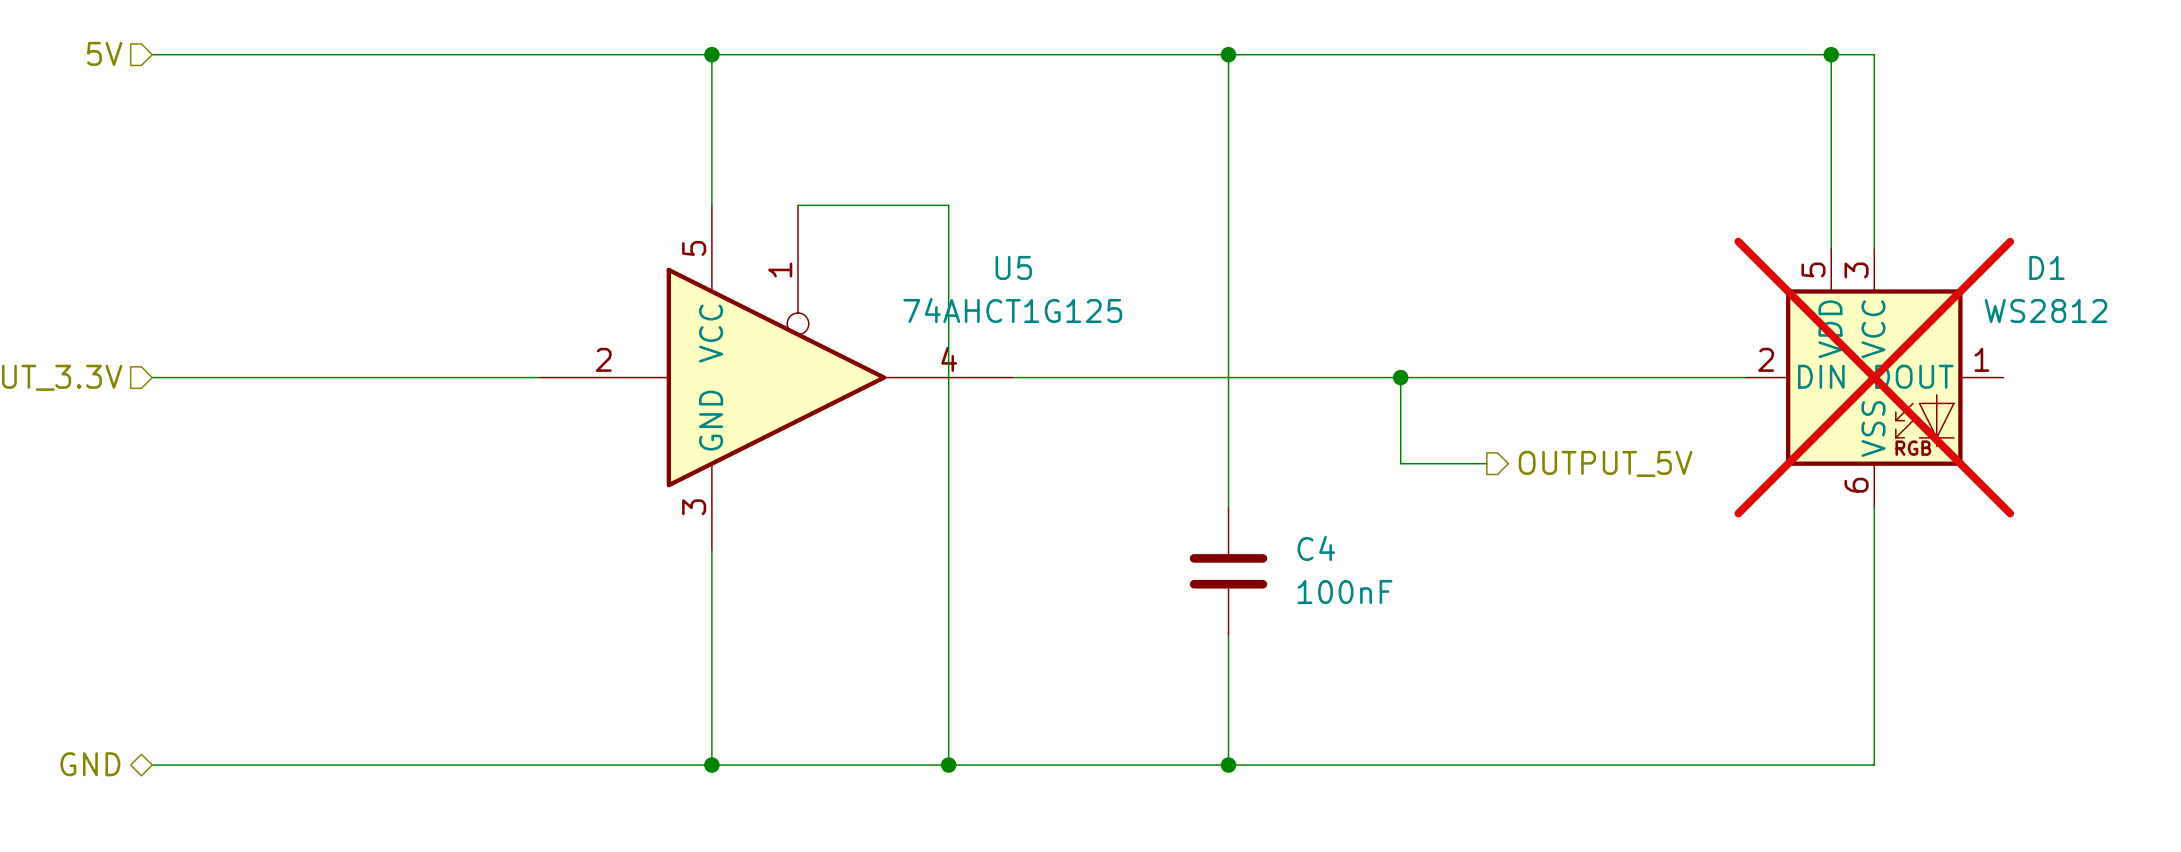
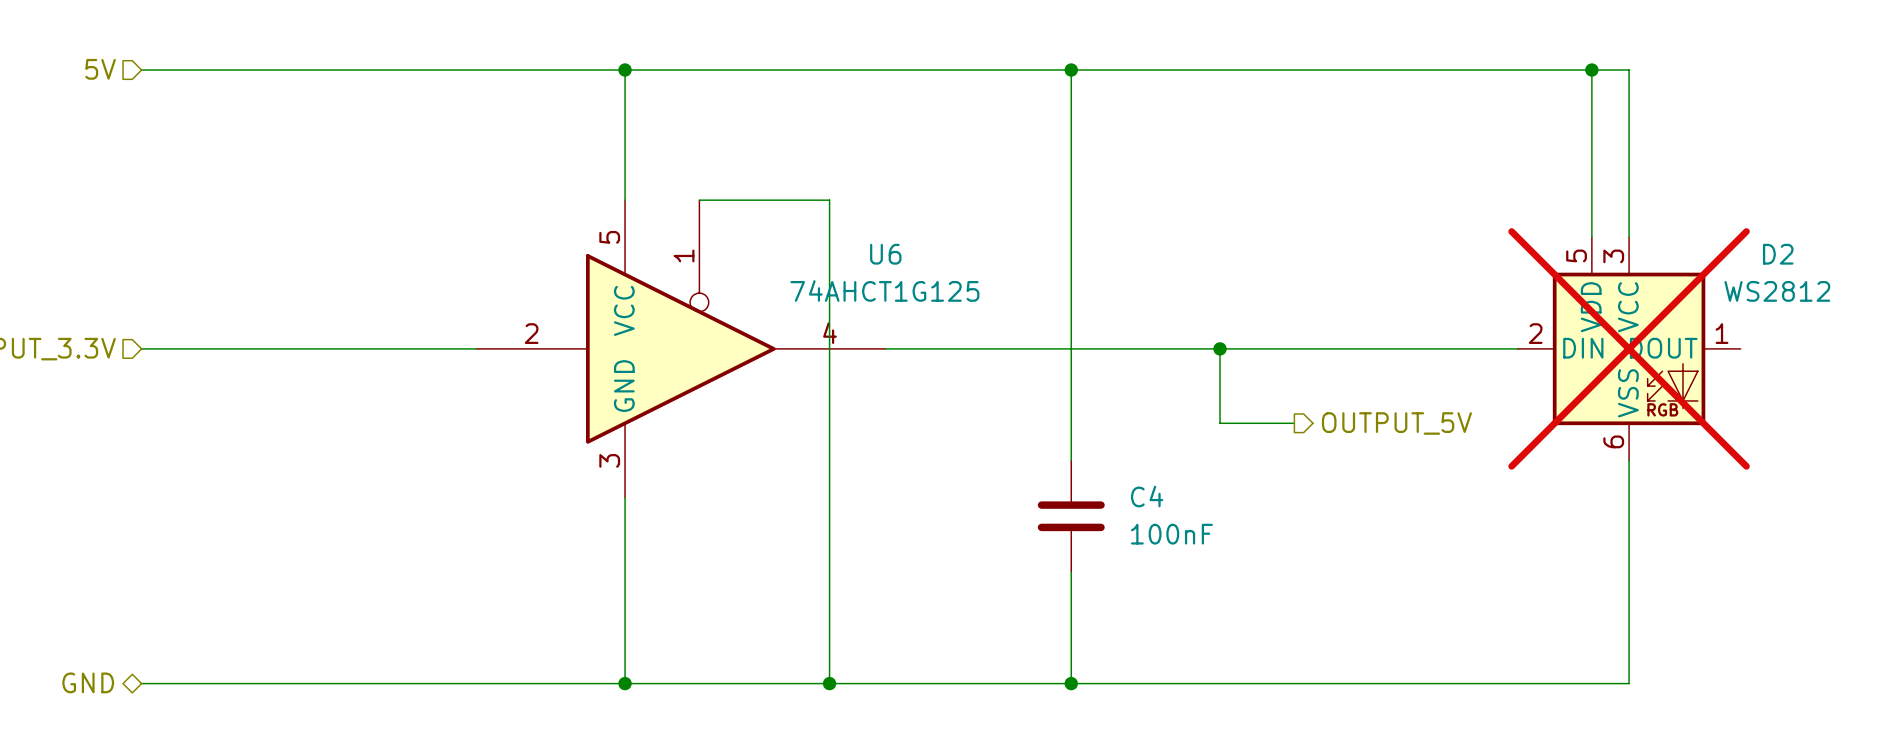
U5 name: U5 (1013, 267) -> U6 (885, 254)
D1 name: D1 (2047, 267) -> D2 (1778, 254)

